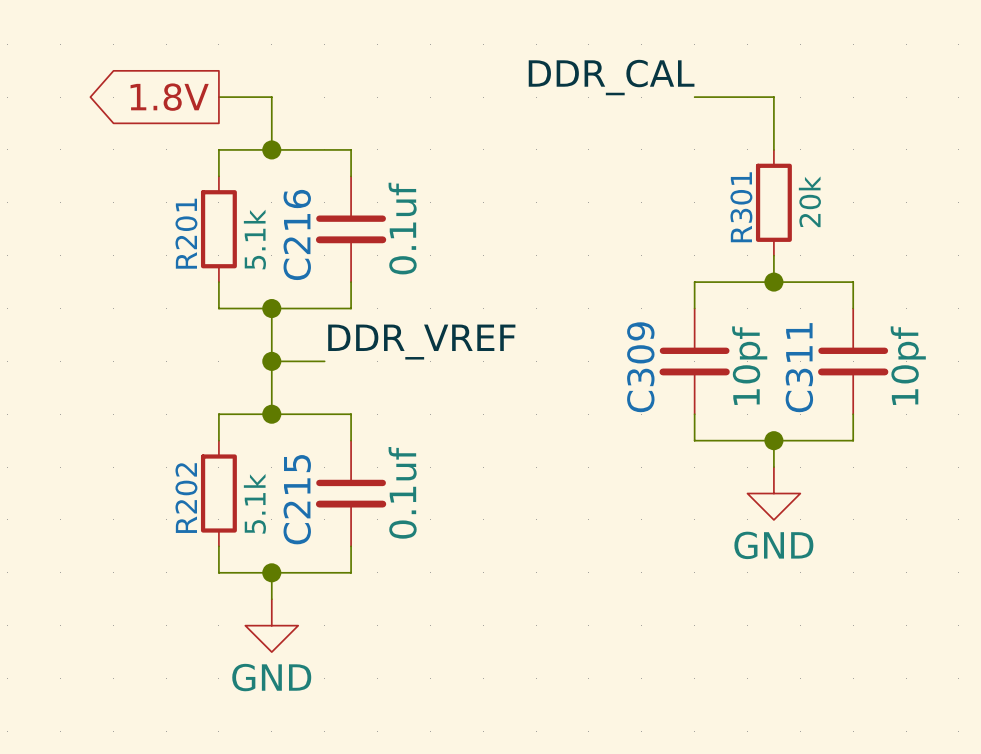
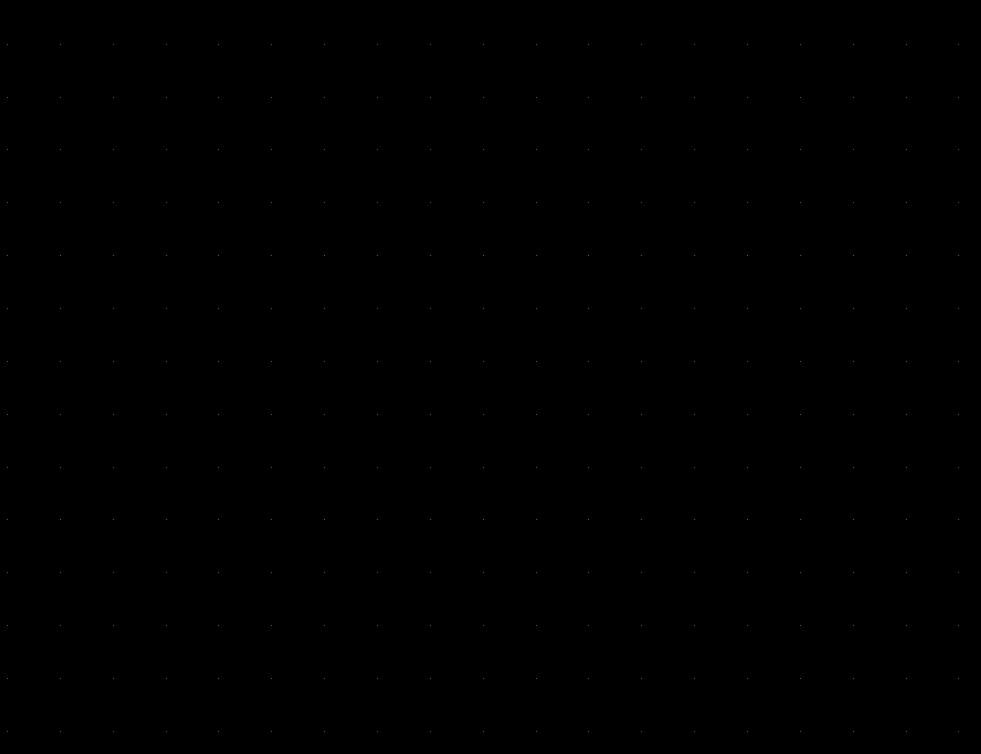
label: DDR_CAL (611, 77) -> none
global label: 1.8V (169, 97) -> none
wire: (218, 97) (271, 97) (271, 149) -> none
wire: (694, 97) (773, 97) (773, 149) -> none
junction: (271, 149) -> none
wire: (218, 176) (218, 149) (351, 149) (351, 176) -> none
R301: 20k (773, 202) -> none
R201: 5.1k (218, 229) -> none
C216: 0.1uf (351, 229) -> none
wire: (773, 255) (773, 282) -> none
wire: (218, 282) (218, 308) (351, 308) (351, 282) -> none
junction: (773, 282) -> none
wire: (271, 308) (271, 414) -> none
junction: (271, 308) -> none
wire: (694, 308) (694, 282) (853, 282) (853, 308) -> none
label: DDR_VREF (421, 342) -> none
wire: (271, 361) (324, 361) -> none
junction: (271, 361) -> none
C309: 10pf (694, 361) -> none
C311: 10pf (853, 361) -> none
junction: (271, 414) -> none
wire: (694, 414) (694, 440) (853, 440) (853, 414) -> none
wire: (218, 440) (218, 414) (351, 414) (351, 440) -> none
wire: (773, 440) (773, 467) -> none
junction: (773, 440) -> none
R202: 5.1k (218, 493) -> none
C215: 0.1uf (351, 493) -> none
power symbol: GND (773, 493) -> none
wire: (218, 546) (218, 572) (351, 572) (351, 546) -> none
wire: (271, 572) (271, 599) -> none
junction: (271, 572) -> none
power symbol: GND (271, 625) -> none

